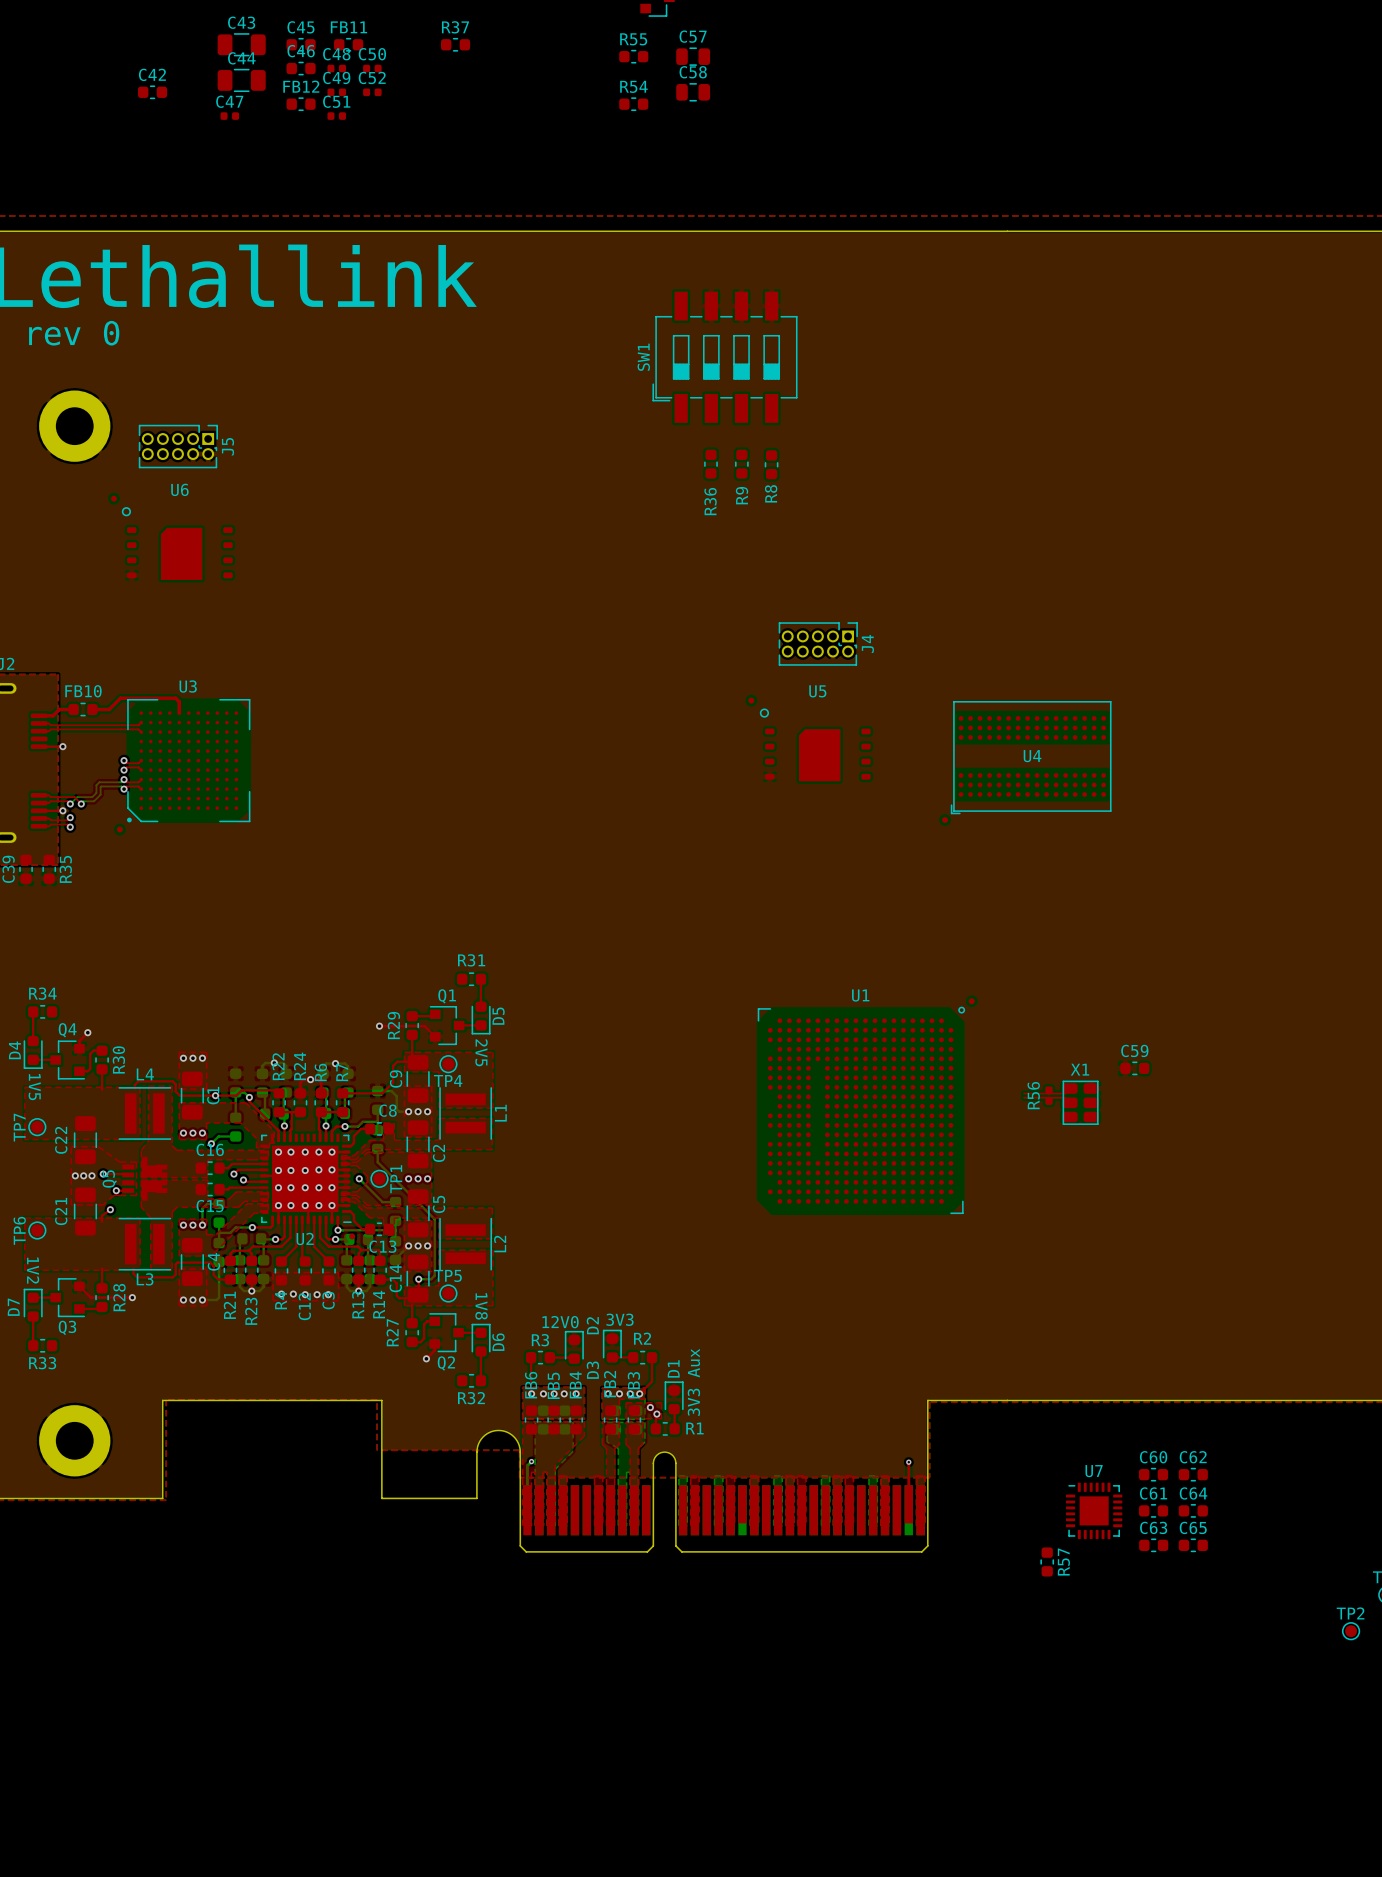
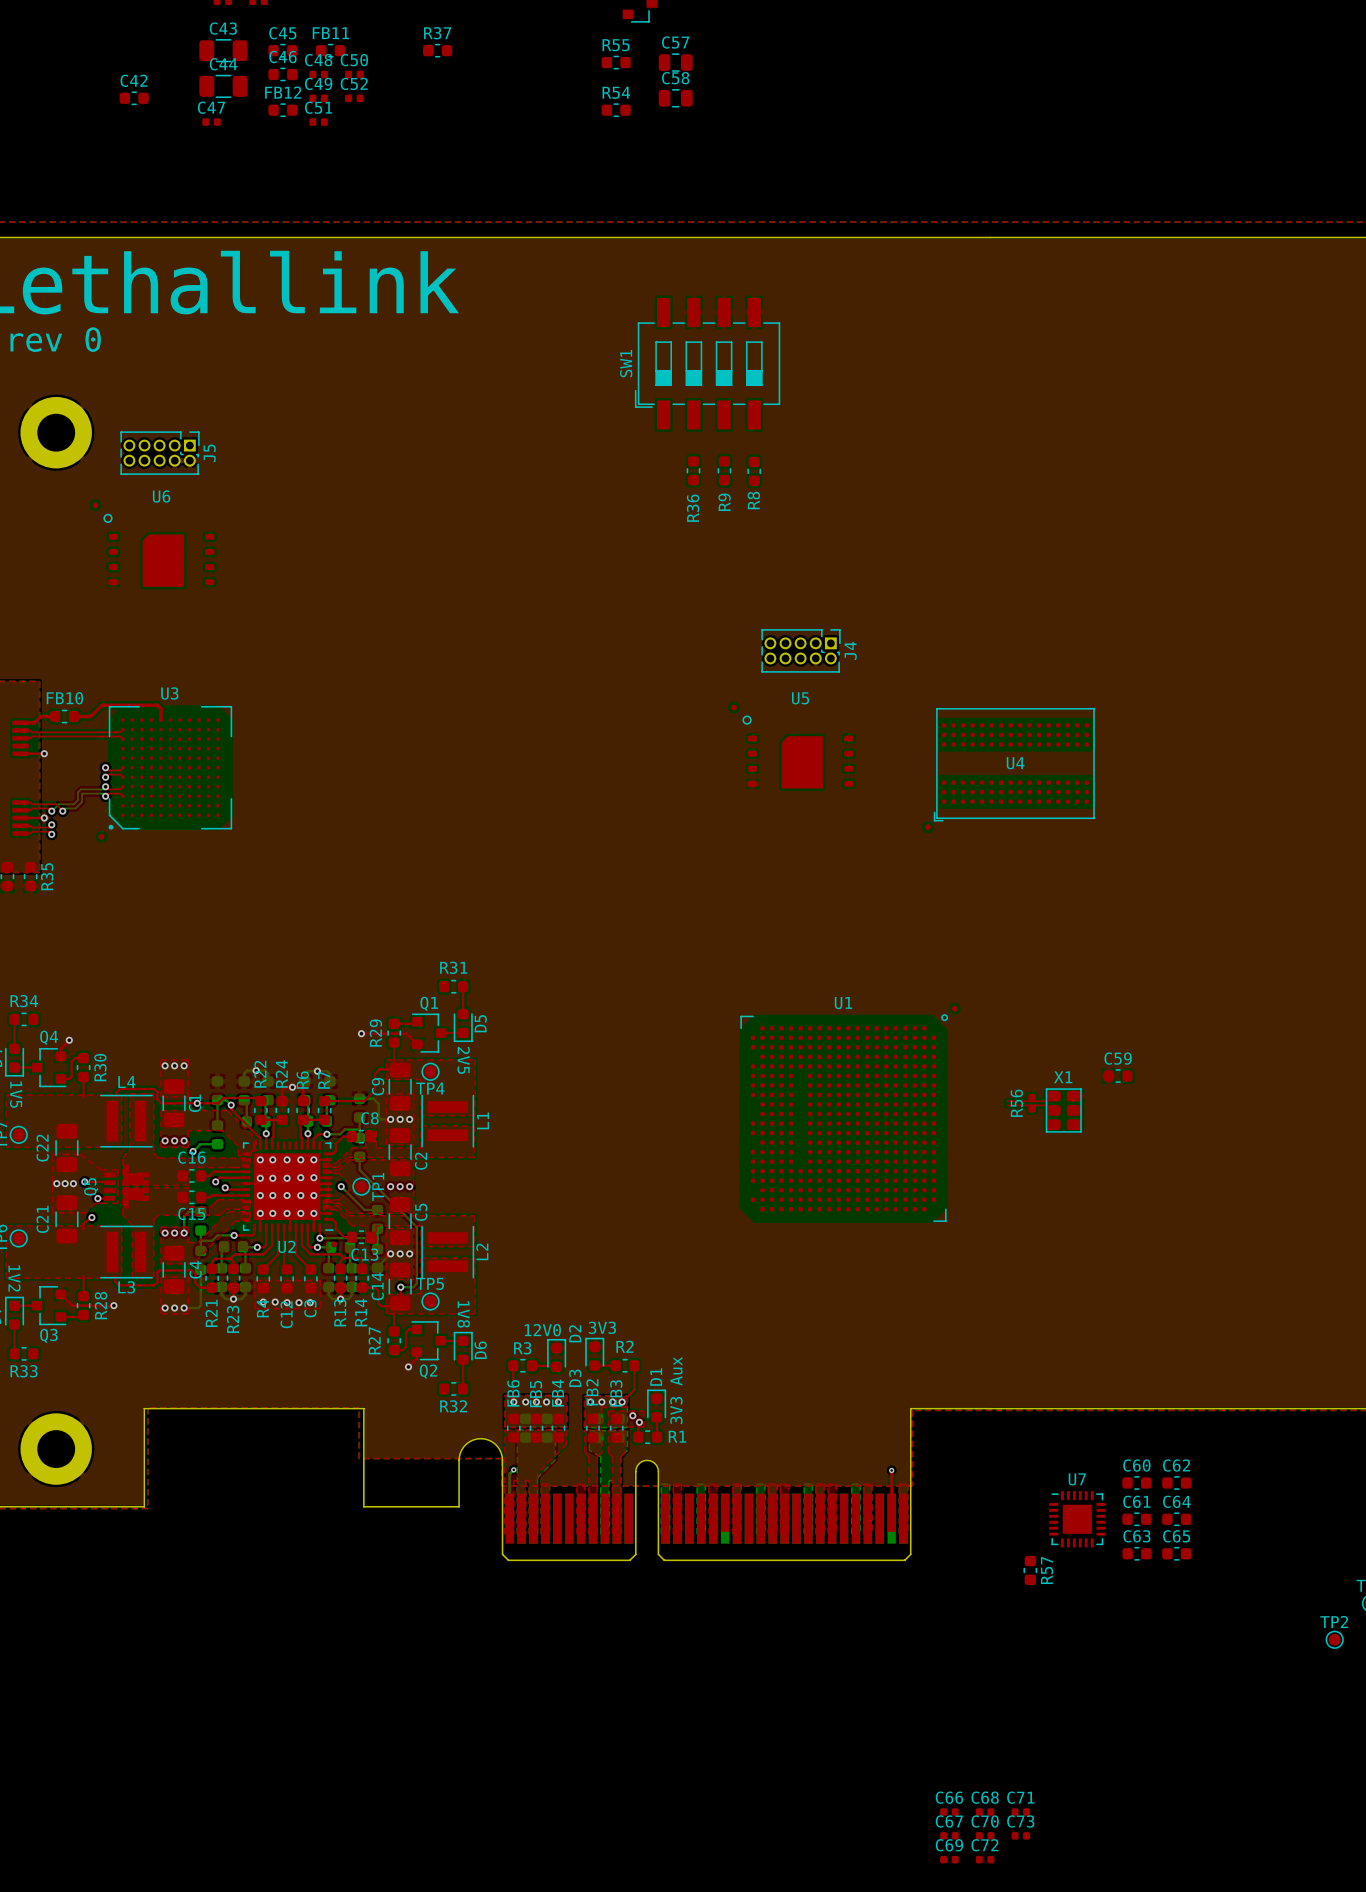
C66: none -> (949, 1812)
C68: none -> (985, 1812)
C71: none -> (1020, 1812)
C67: none -> (949, 1835)
C70: none -> (985, 1835)
C73: none -> (1020, 1835)
C69: none -> (949, 1859)
C72: none -> (985, 1859)

